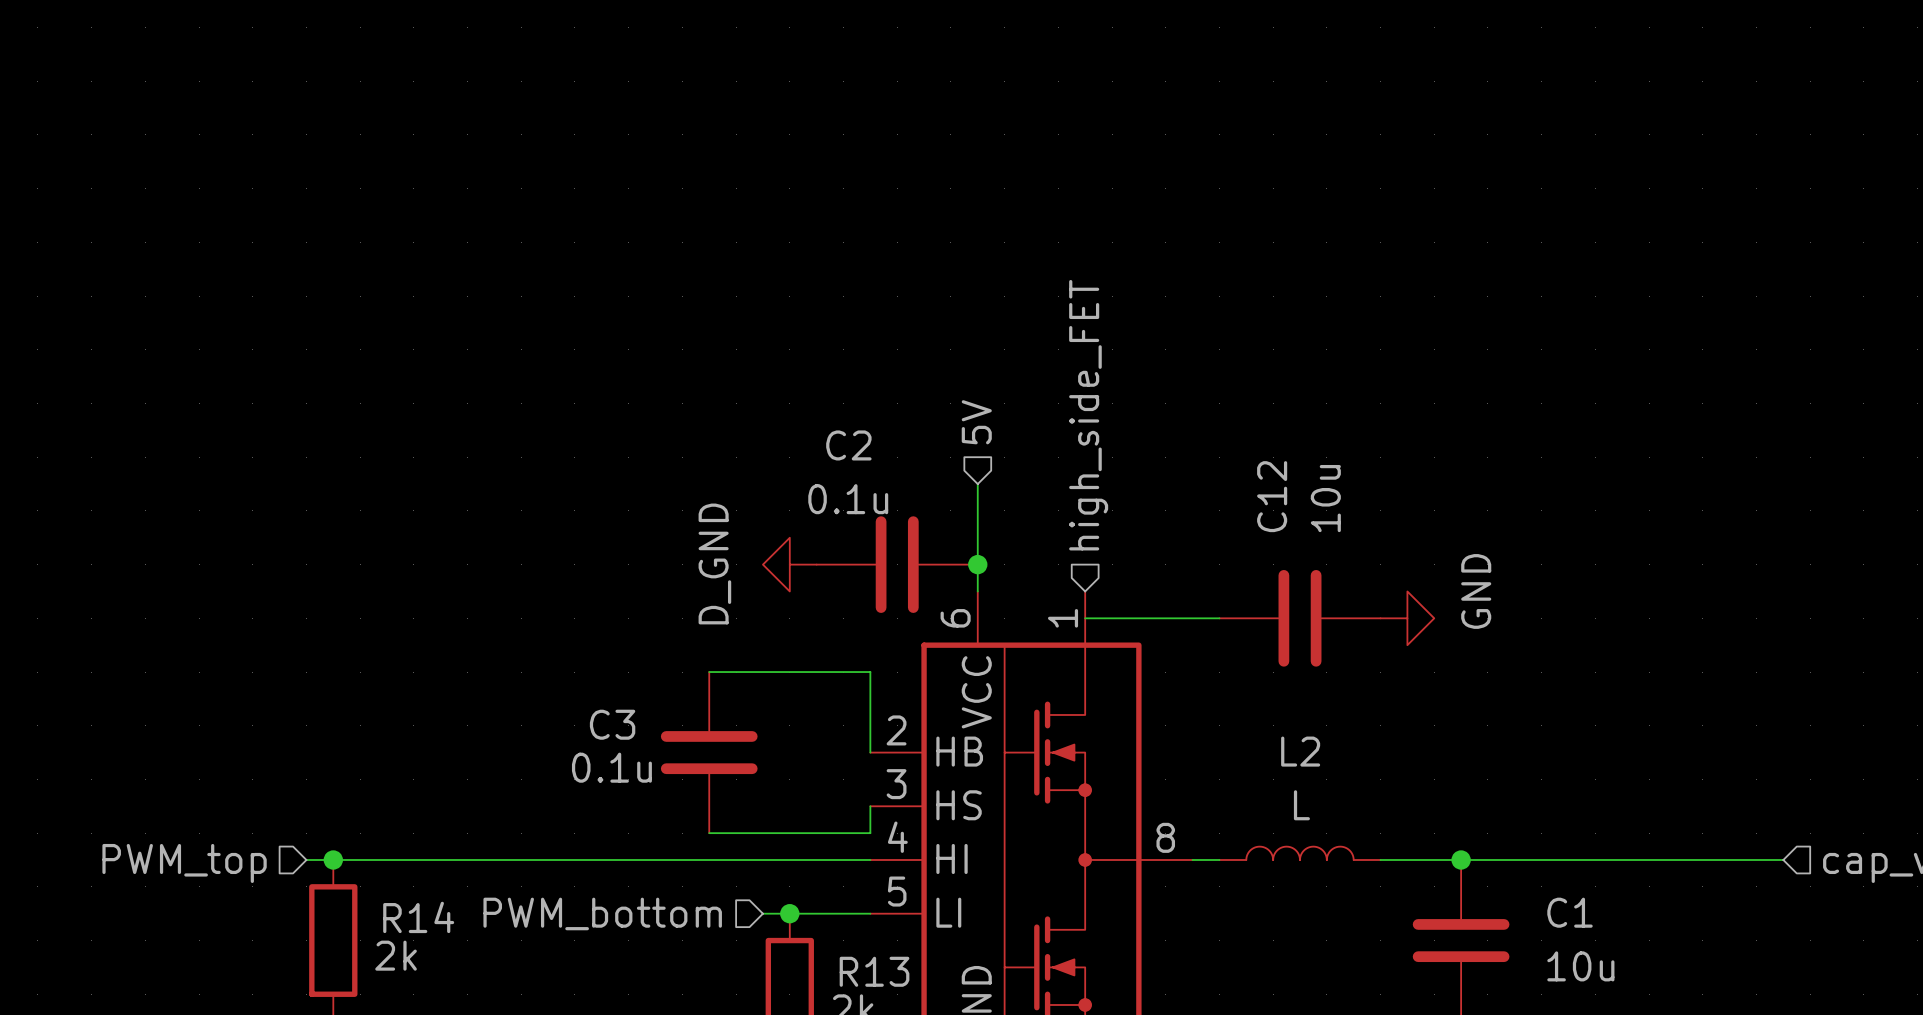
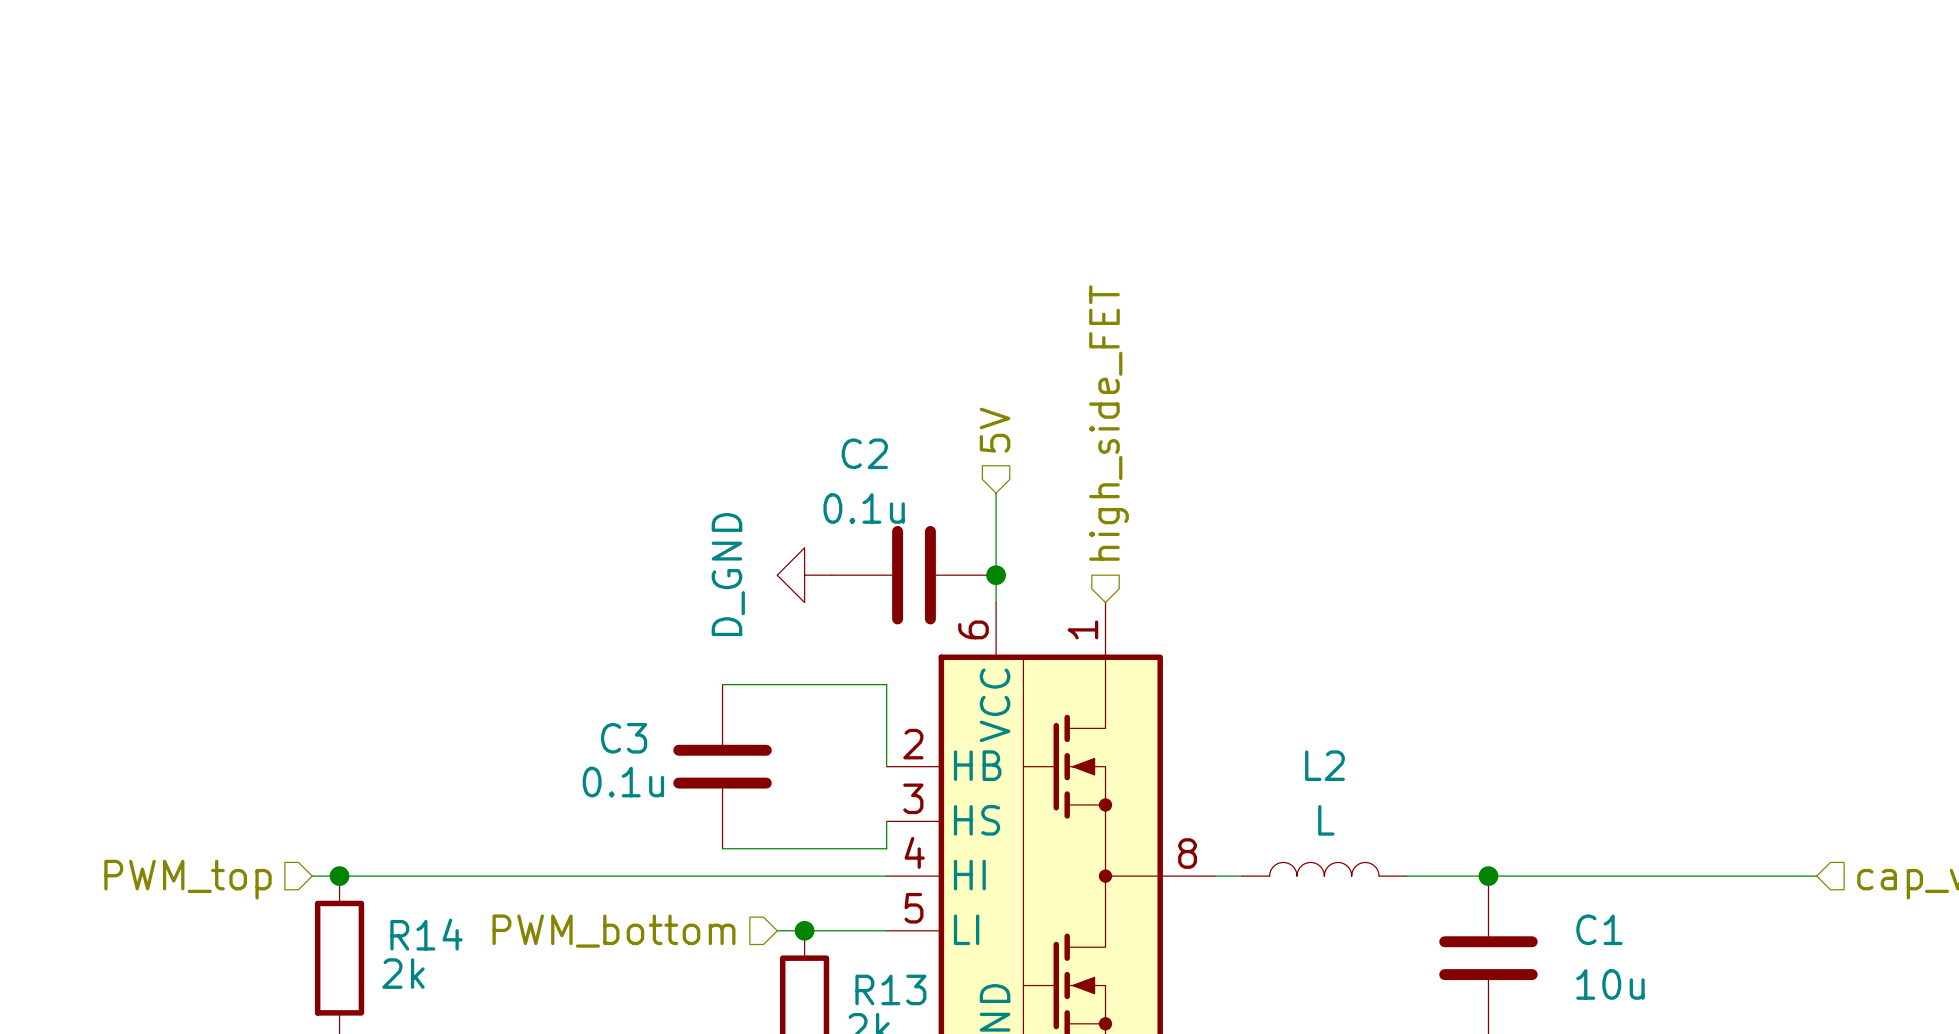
wire: (1085, 618) (1219, 618) -> none
C12: 10u (1299, 618) -> none
power symbol: GND (1407, 618) -> none

